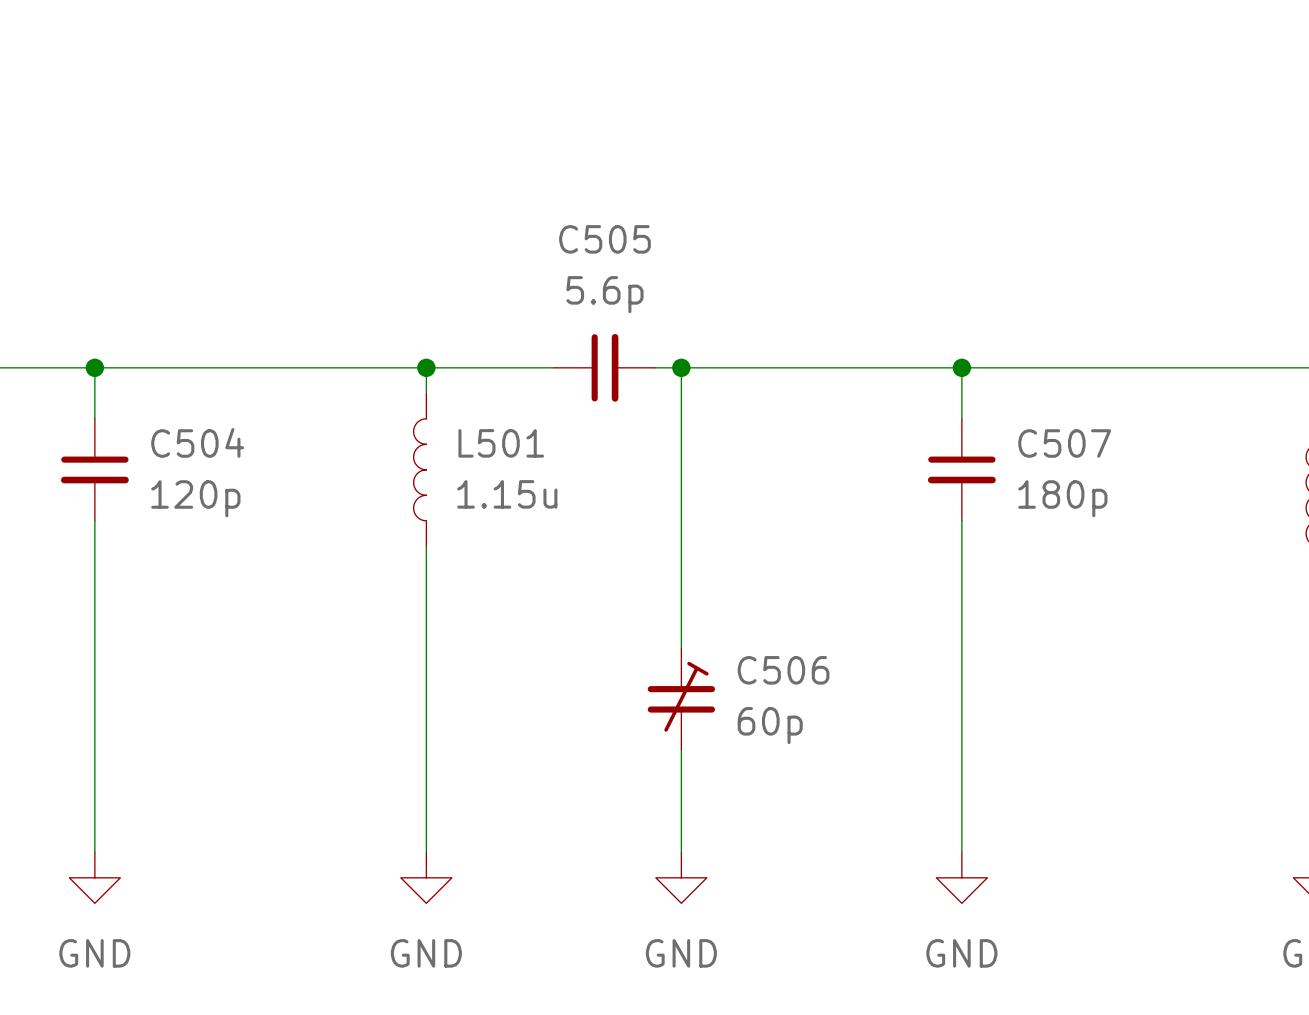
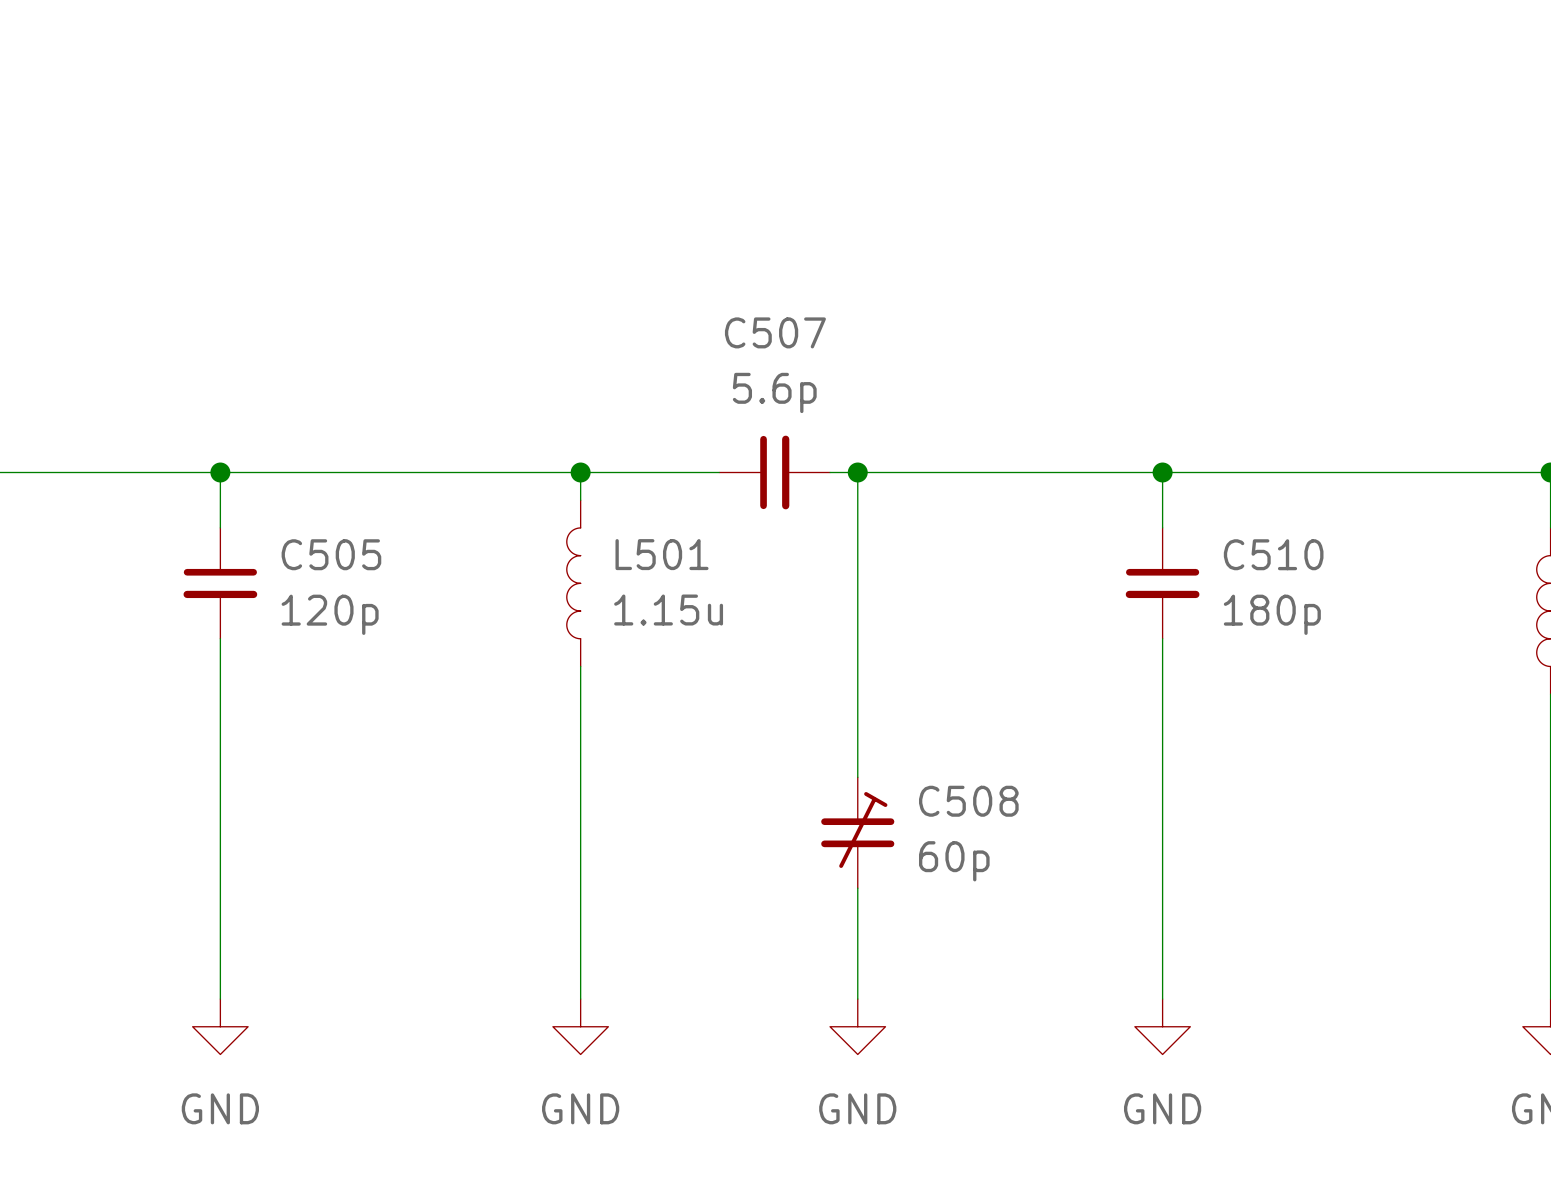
C505 name: C505 (604, 239) -> C507 (775, 332)
C504 name: C504 (197, 442) -> C505 (331, 554)
C507 name: C507 (1064, 443) -> C510 (1273, 554)
C506 name: C506 (783, 670) -> C508 (968, 801)

